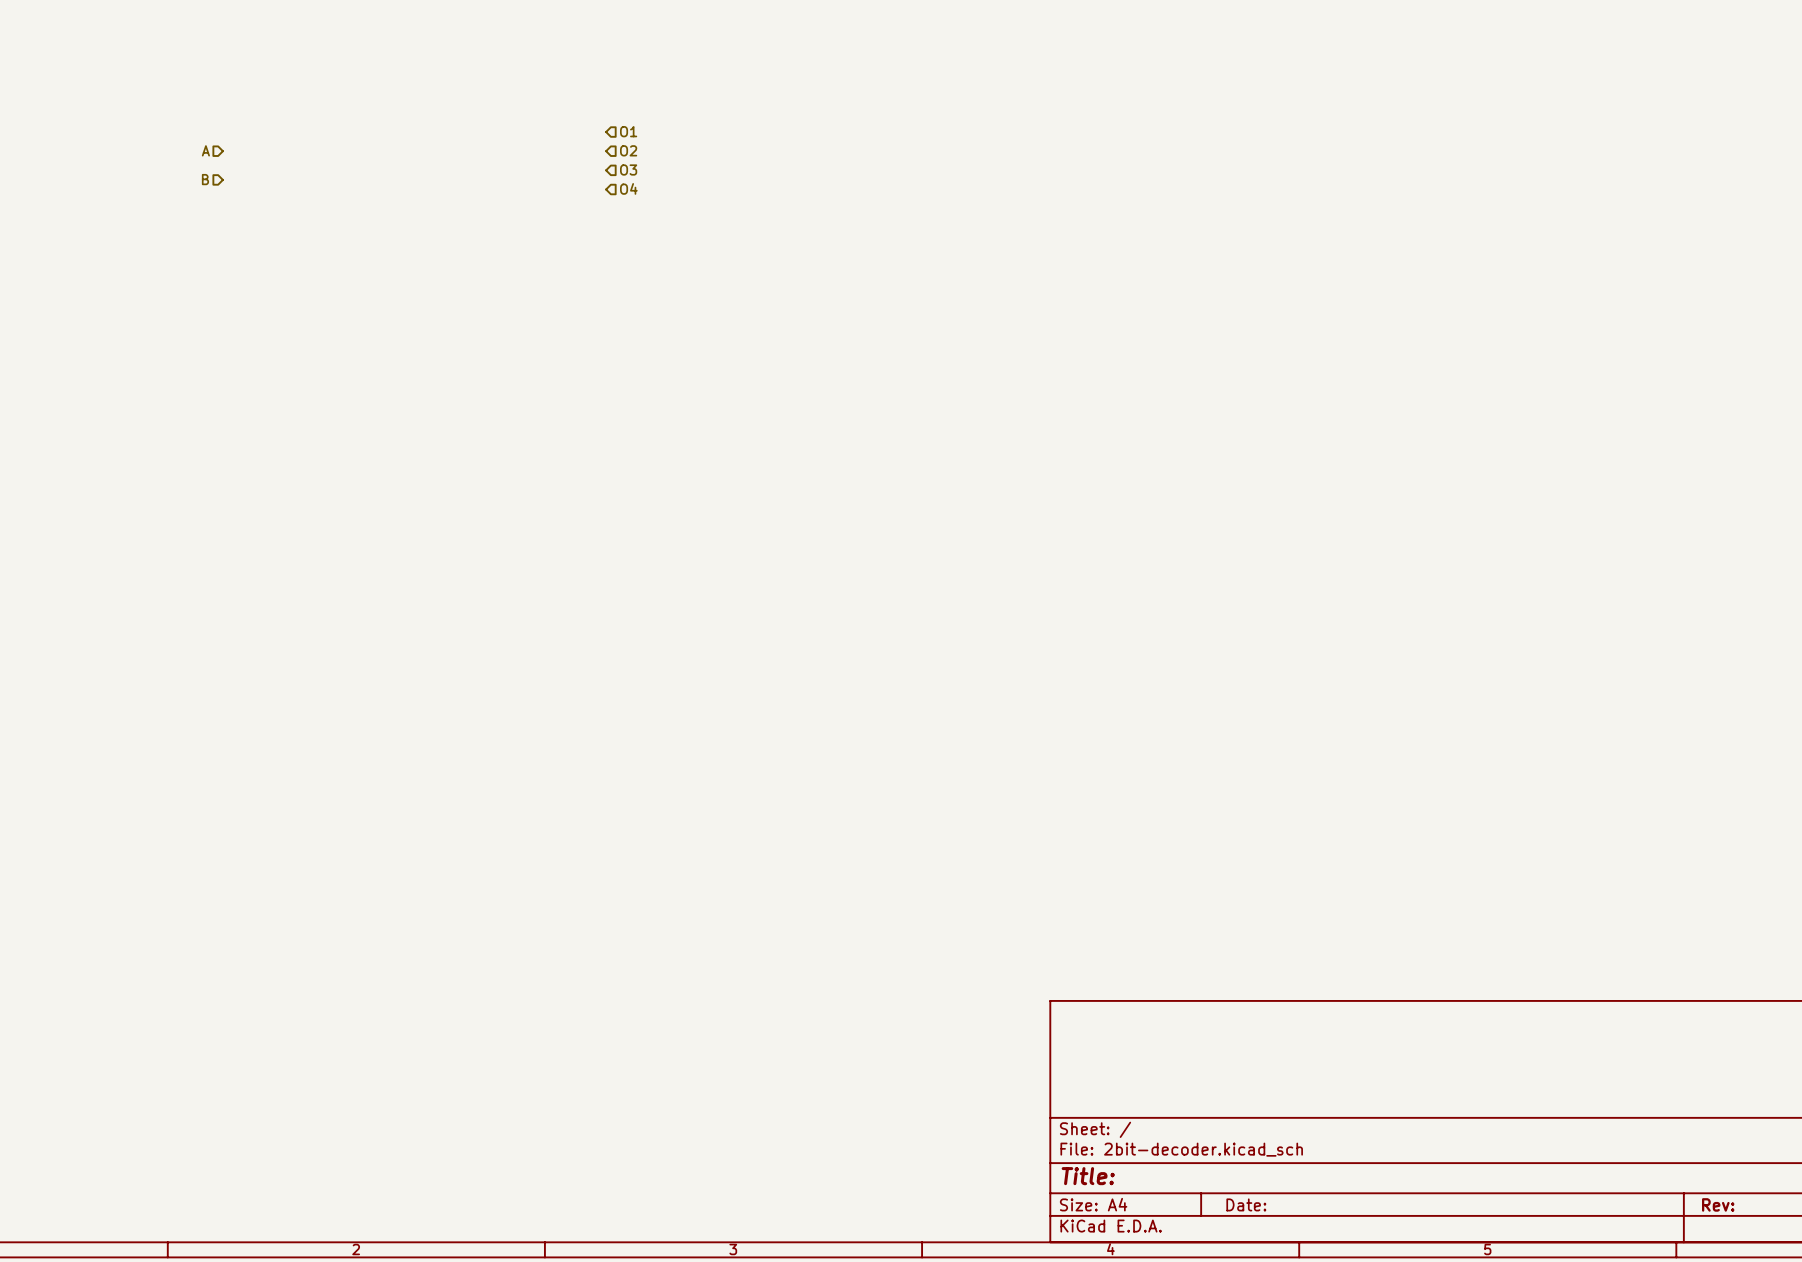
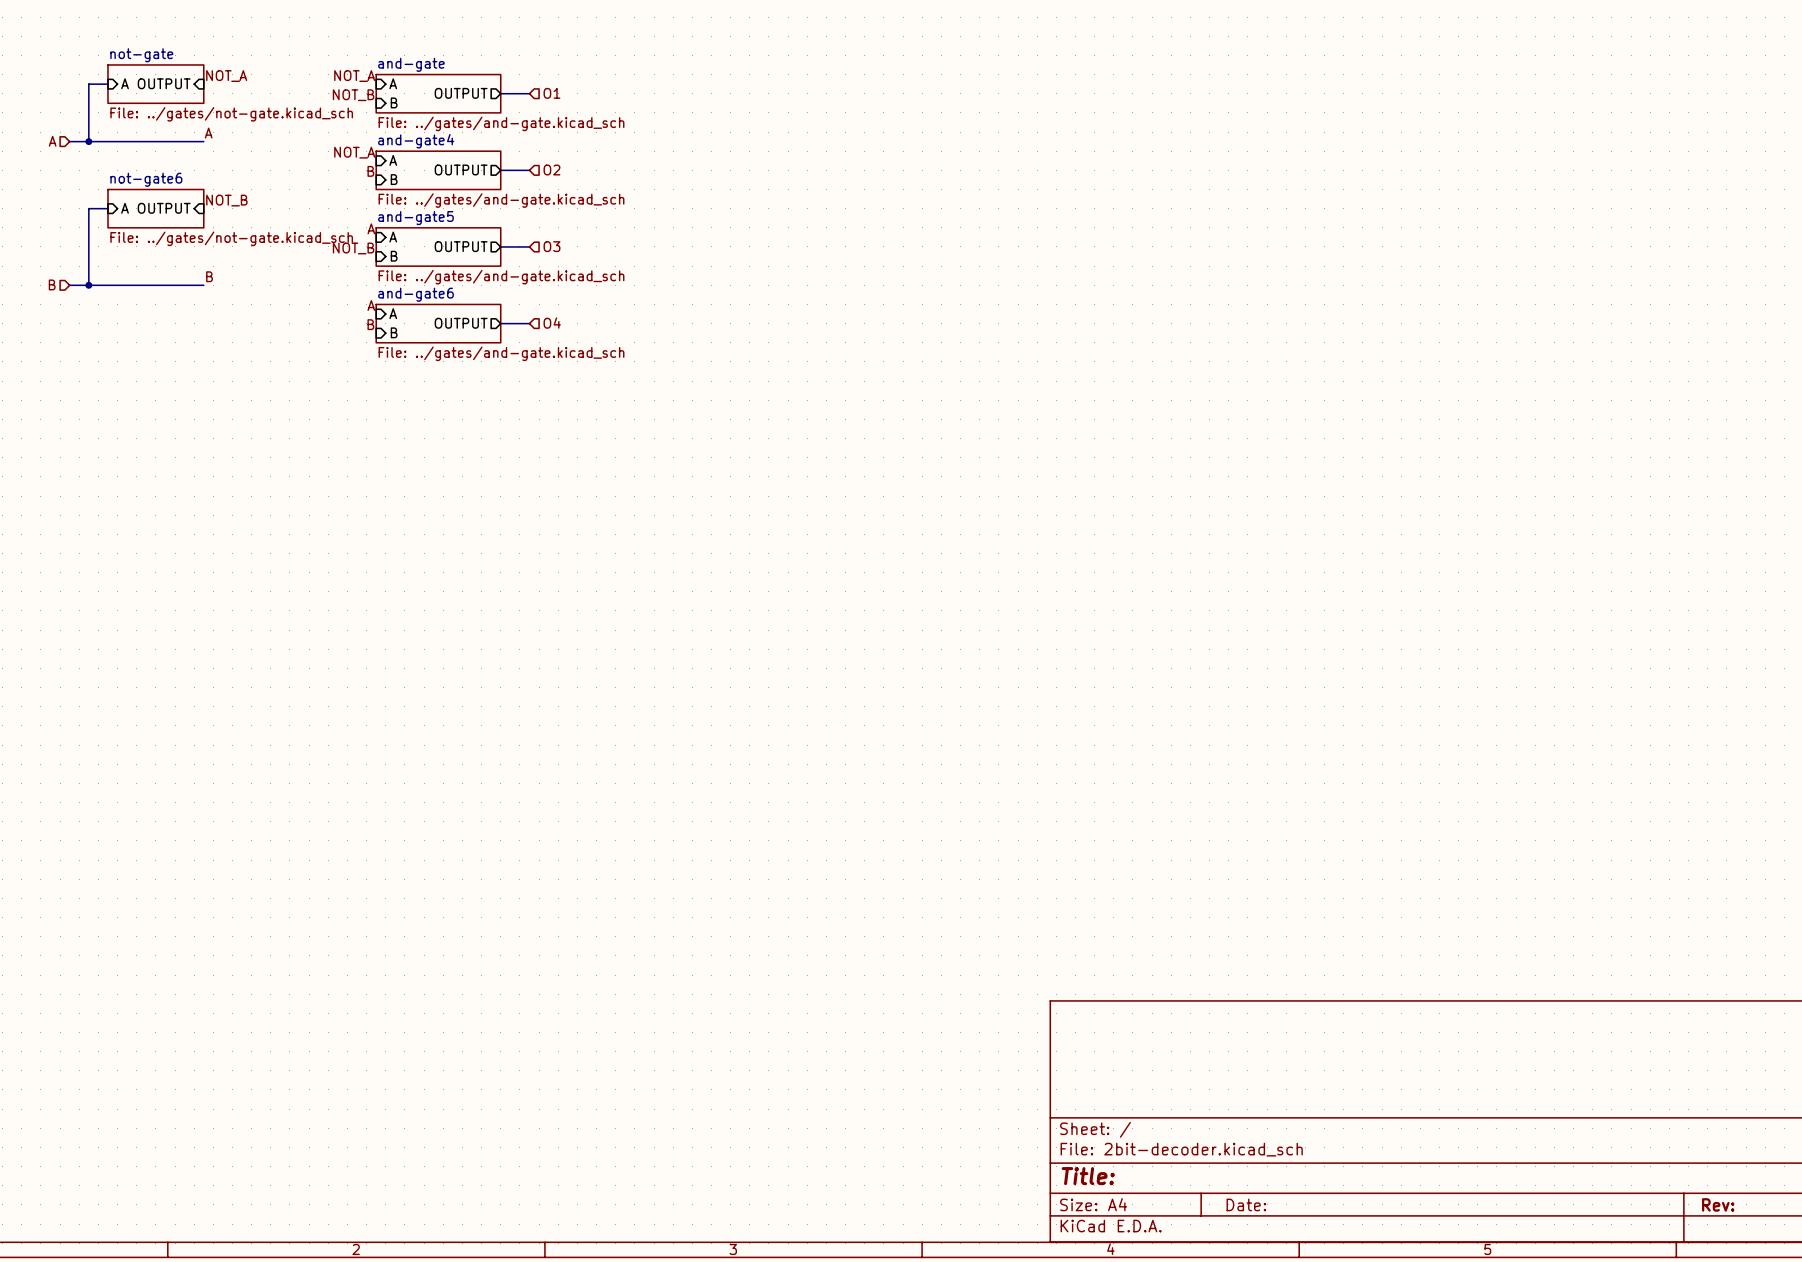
label: none -> NOT_A (226, 76)
label: none -> NOT_A (354, 76)
sheet pin: none -> A (125, 83)
sheet pin: none -> OUTPUT (164, 83)
sheet pin: none -> A (393, 83)
wire: none -> (107, 84) (88, 84) (88, 141)
sheet not-gate: none -> File: ../gates/not-gate.kicad_sch (155, 84)
sheet and-gate: none -> File: ../gates/and-gate.kicad_sch (438, 93)
sheet pin: none -> OUTPUT (461, 93)
wire: none -> (500, 93) (529, 93)
label: none -> NOT_B (353, 95)
sheet pin: none -> B (394, 102)
hierarchical label position: O1 (628, 131) -> O1 (551, 93)
label: none -> A (208, 133)
wire: none -> (69, 141) (203, 141)
junction: none -> (88, 141)
hierarchical label position: A (205, 150) -> A (52, 141)
hierarchical label position: O2 (628, 150) -> O2 (551, 169)
label: none -> NOT_A (354, 152)
sheet pin: none -> A (393, 160)
sheet pin: none -> OUTPUT (461, 169)
hierarchical label position: O3 (628, 169) -> O3 (551, 246)
sheet and-gate4: none -> File: ../gates/and-gate.kicad_sch (438, 170)
wire: none -> (500, 170) (529, 170)
label: none -> B (370, 171)
hierarchical label position: B (205, 179) -> B (52, 284)
sheet pin: none -> B (394, 179)
hierarchical label position: O4 (628, 188) -> O4 (552, 323)
label: none -> NOT_B (226, 200)
wire: none -> (107, 208) (88, 208) (88, 285)
sheet pin: none -> A (125, 208)
sheet not-gate6: none -> File: ../gates/not-gate.kicad_sch (155, 208)
sheet pin: none -> OUTPUT (164, 208)
label: none -> A (371, 228)
sheet pin: none -> A (393, 237)
sheet and-gate5: none -> File: ../gates/and-gate.kicad_sch (438, 246)
sheet pin: none -> OUTPUT (461, 246)
wire: none -> (500, 246) (529, 246)
label: none -> NOT_B (353, 248)
sheet pin: none -> B (394, 256)
label: none -> B (209, 276)
wire: none -> (69, 285) (203, 285)
junction: none -> (88, 285)
label: none -> A (371, 305)
sheet pin: none -> A (393, 313)
sheet and-gate6: none -> File: ../gates/and-gate.kicad_sch (438, 323)
sheet pin: none -> OUTPUT (461, 323)
wire: none -> (500, 323) (529, 323)
label: none -> B (370, 324)
sheet pin: none -> B (394, 332)

